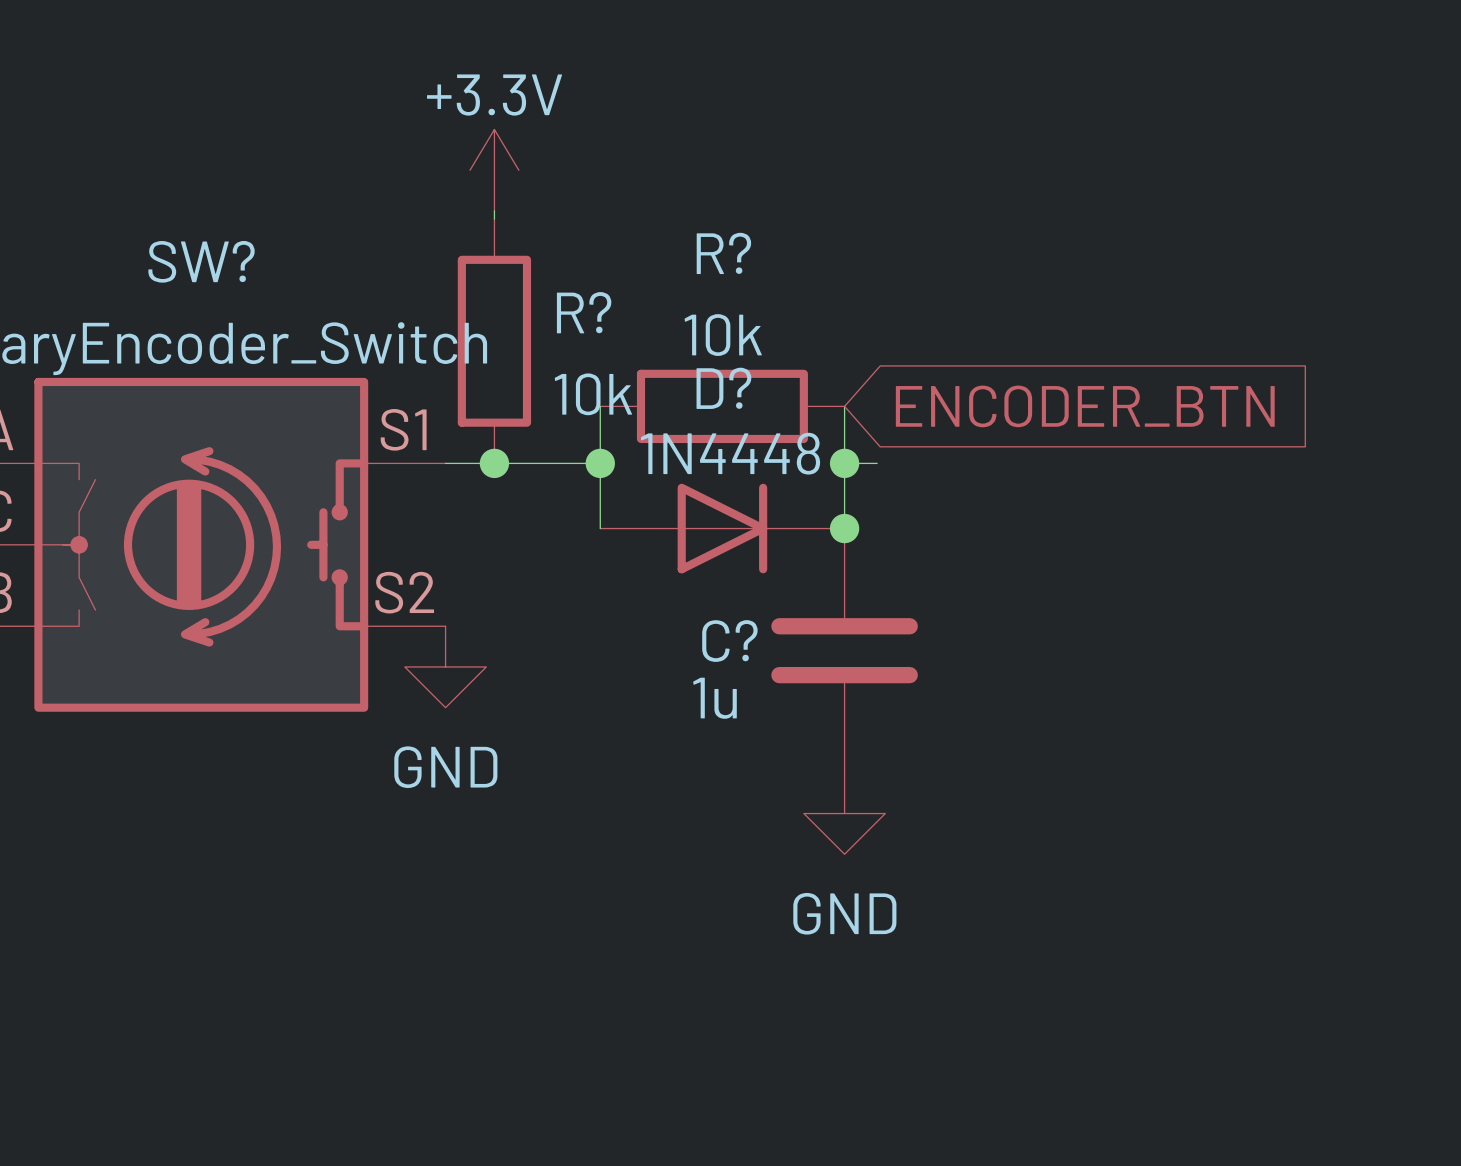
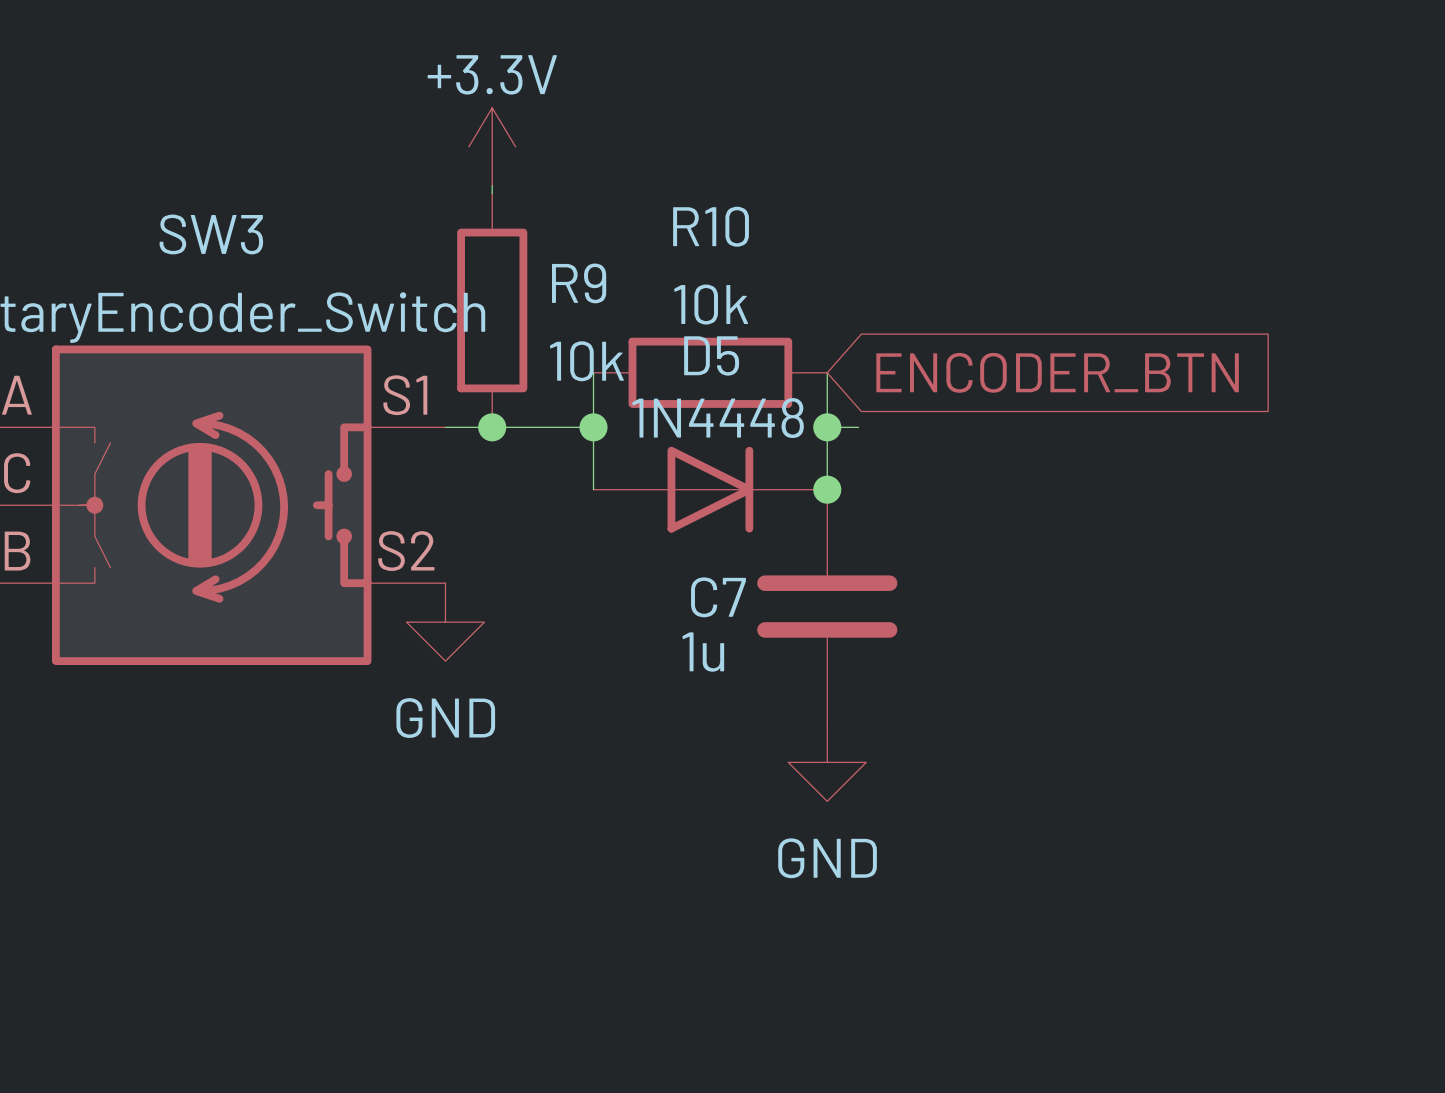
R? name: R? (723, 253) -> R10 (711, 226)
SW? name: SW? (201, 261) -> SW3 (211, 234)
R? name: R? (584, 312) -> R9 (579, 283)
D? name: D? (723, 388) -> D5 (711, 355)
C? name: C? (729, 641) -> C7 (718, 597)

